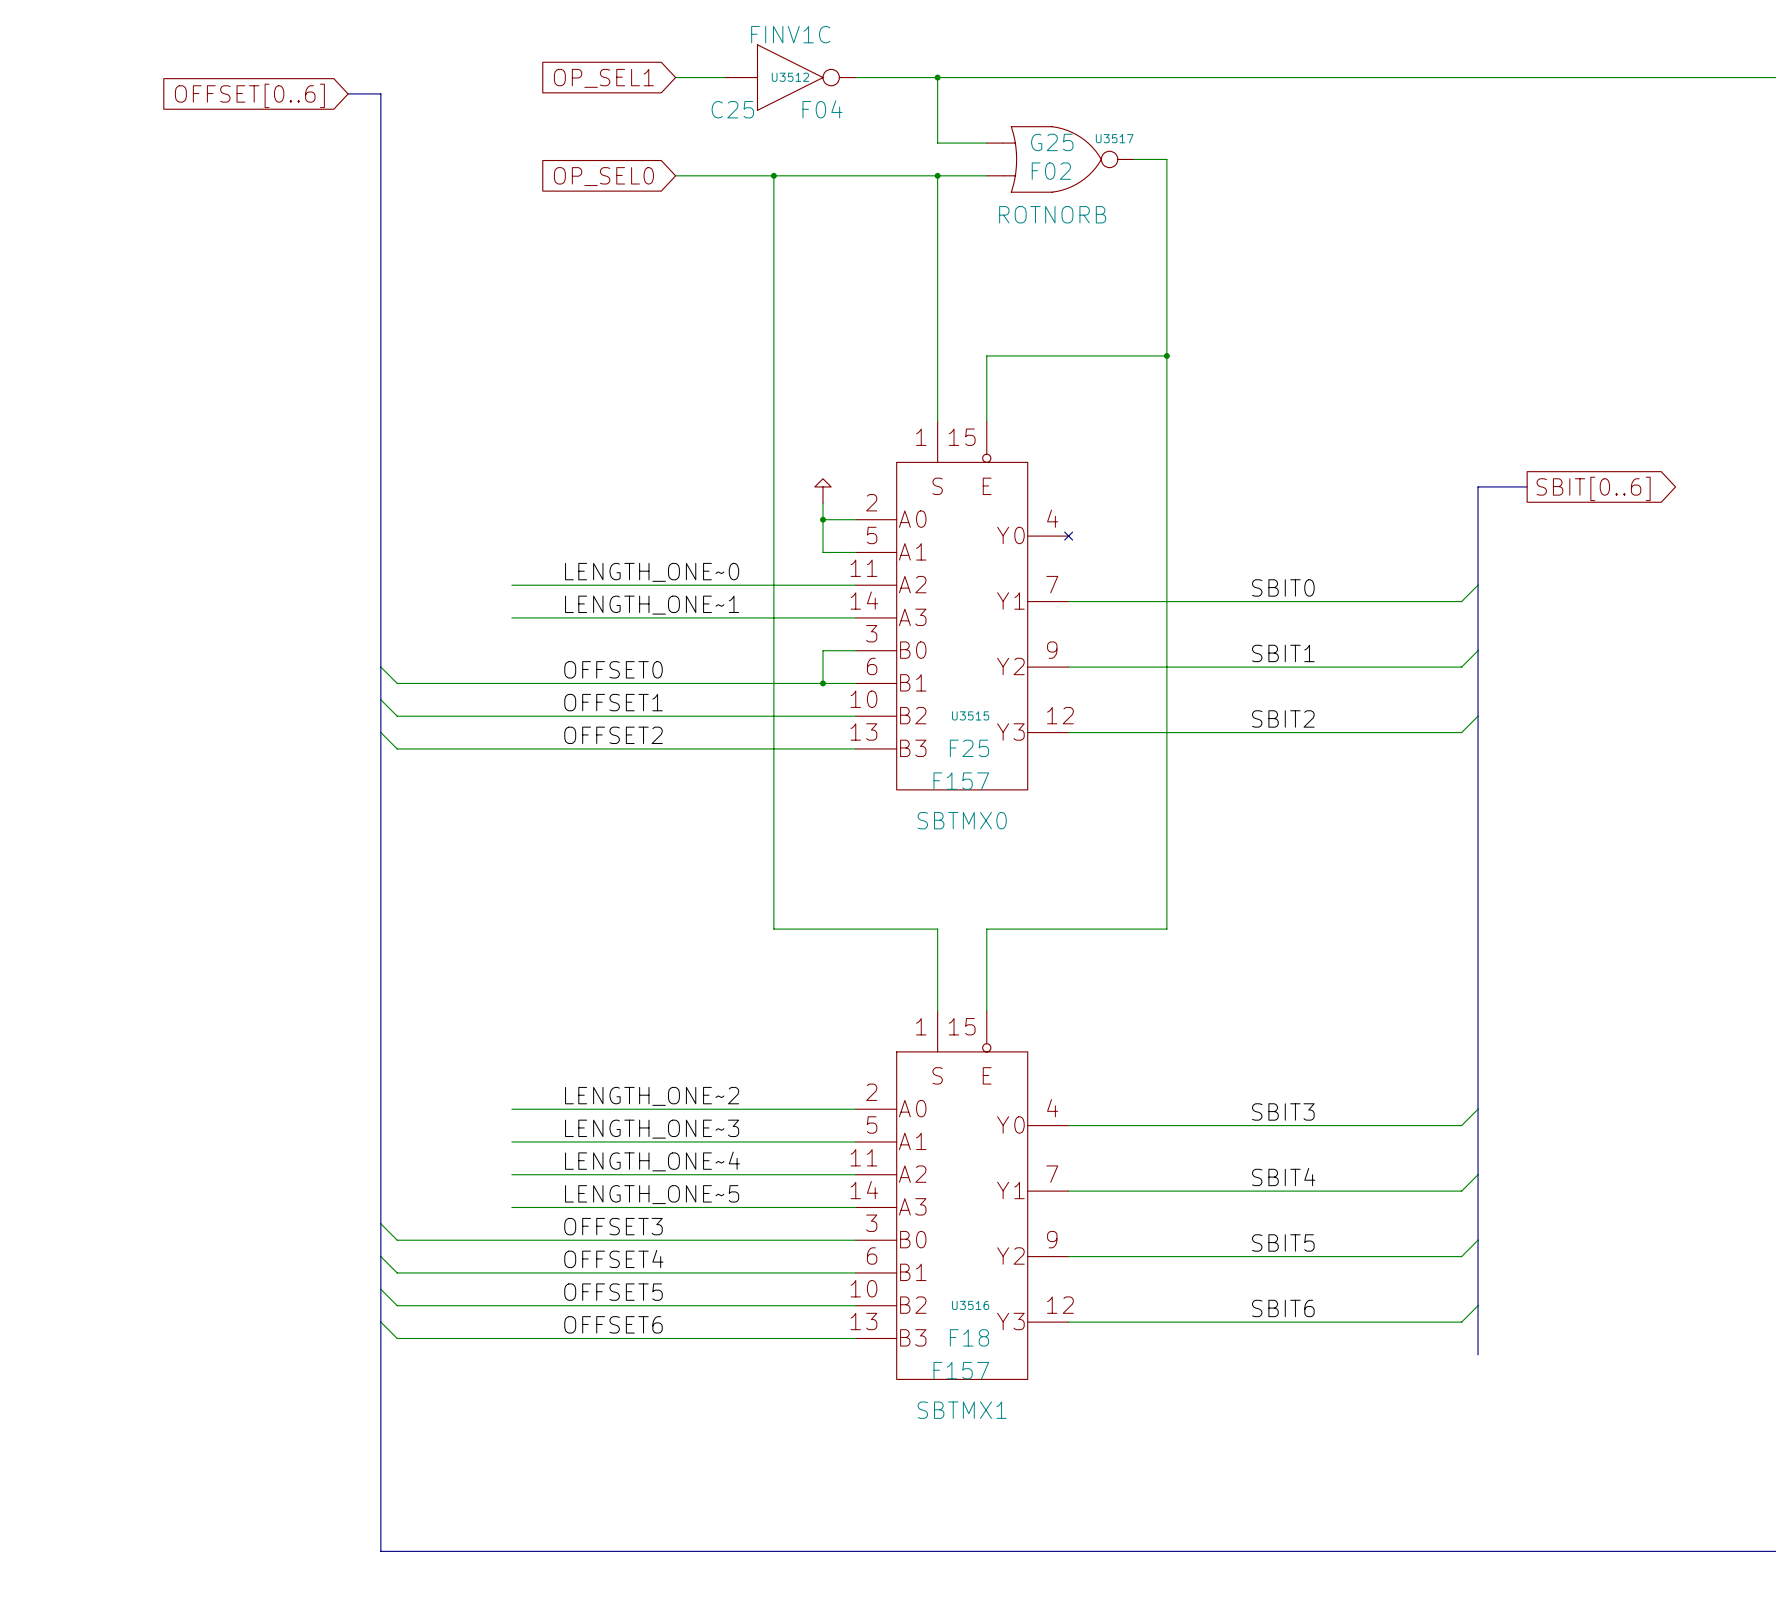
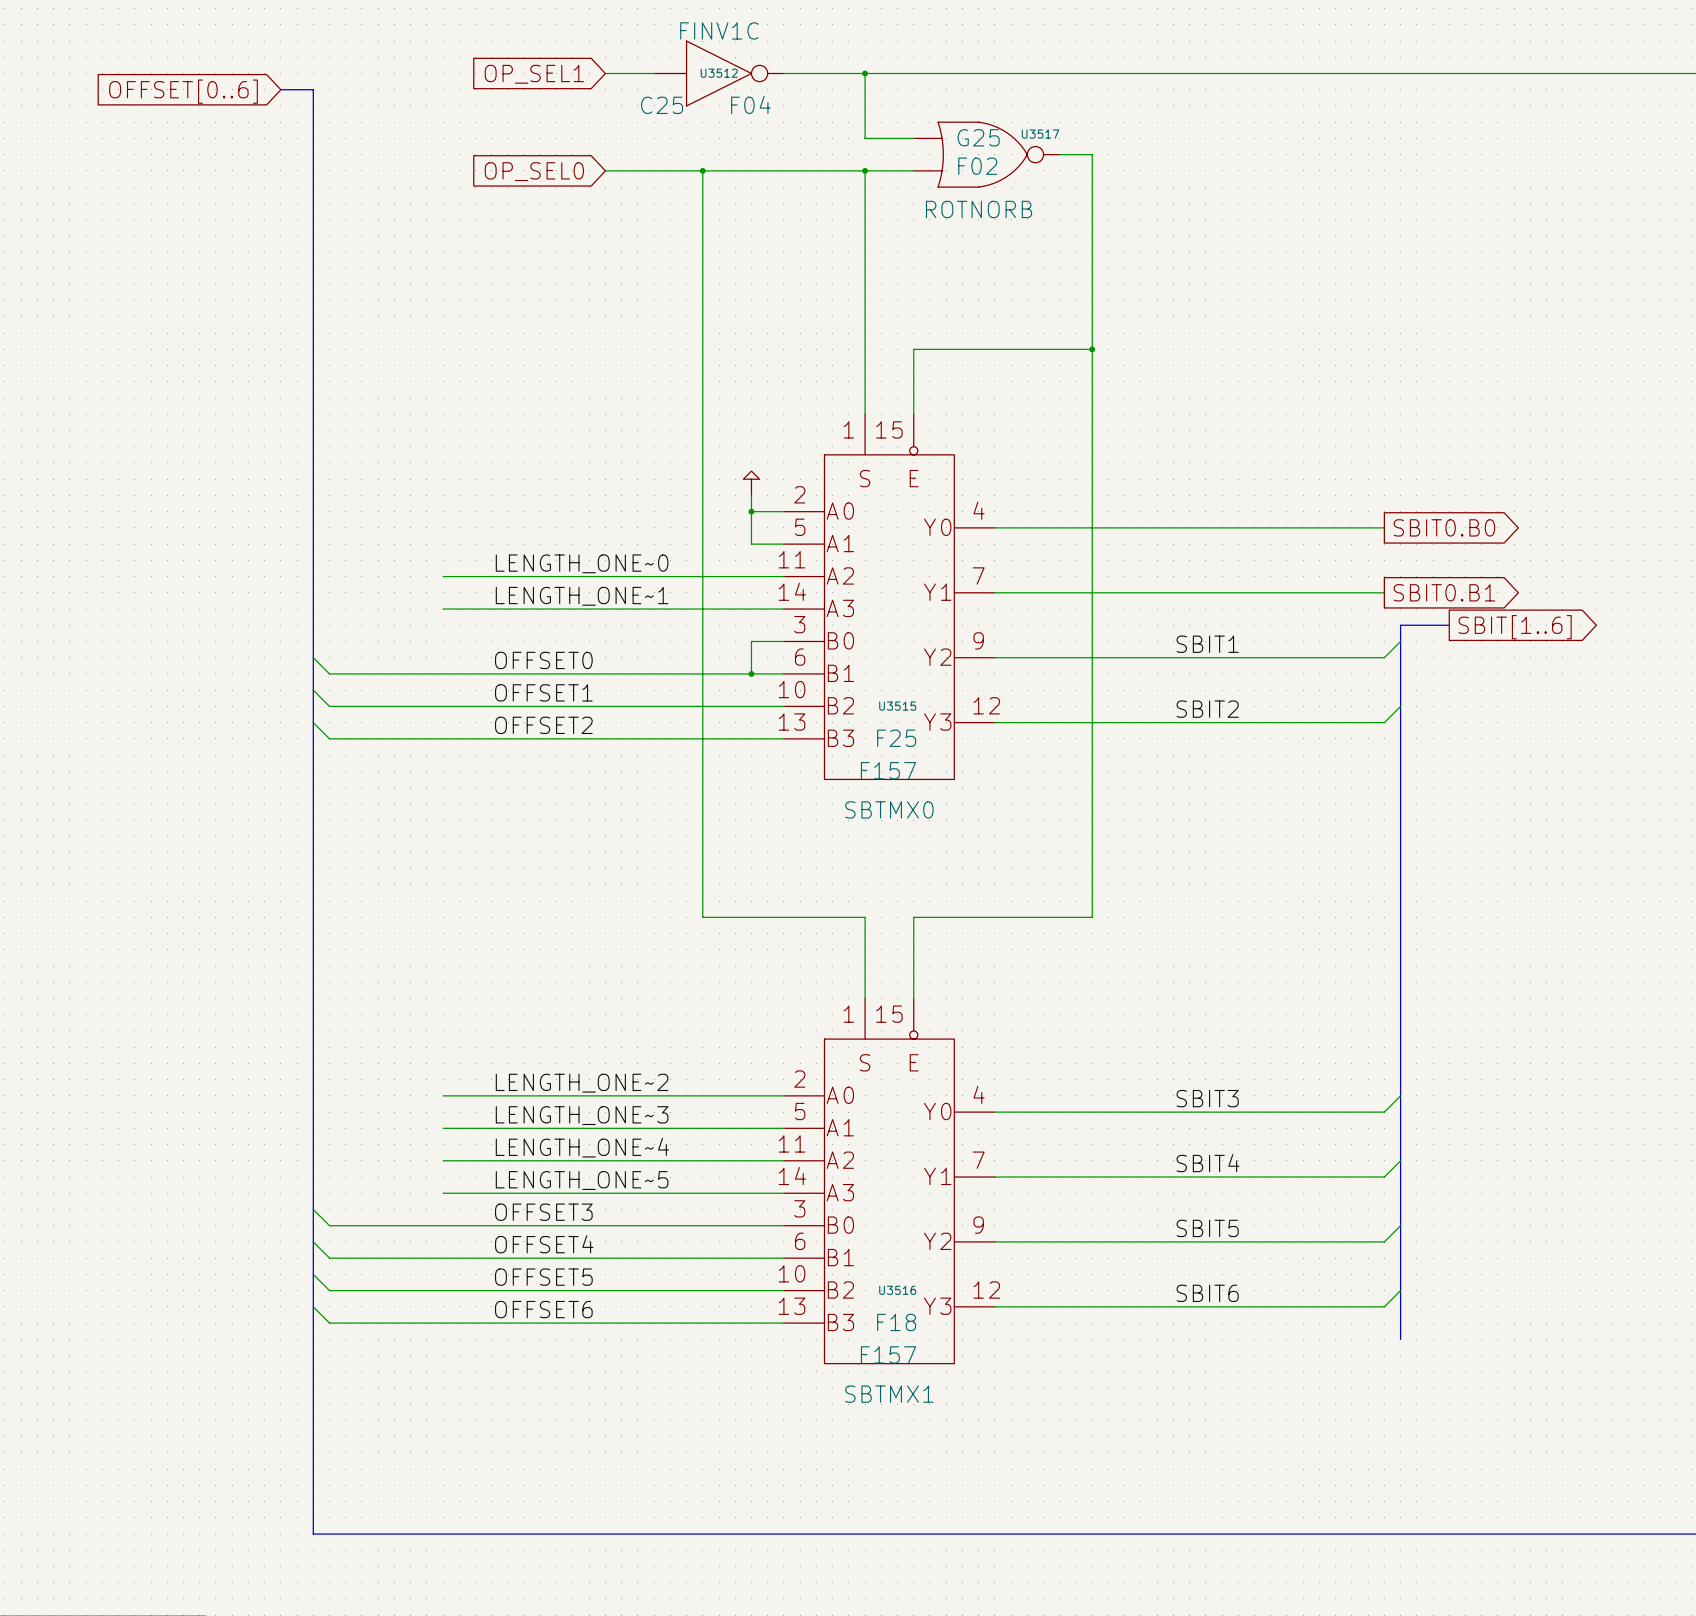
bus: (1527, 486) (1478, 486) (1478, 634) -> (1449, 625) (1400, 625)
global label: SBIT[0..6] (1593, 488) -> none
wire: none -> (994, 527) (1384, 527)
no-connect mark: (1068, 536) -> none
global label: none -> SBIT0.B0 (1444, 527)
wire: (1478, 585) (1461, 601) -> none
label: SBIT0 (1283, 587) -> none
global label: none -> SBIT0.B1 (1444, 592)
global label: none -> SBIT[1..6] (1515, 627)

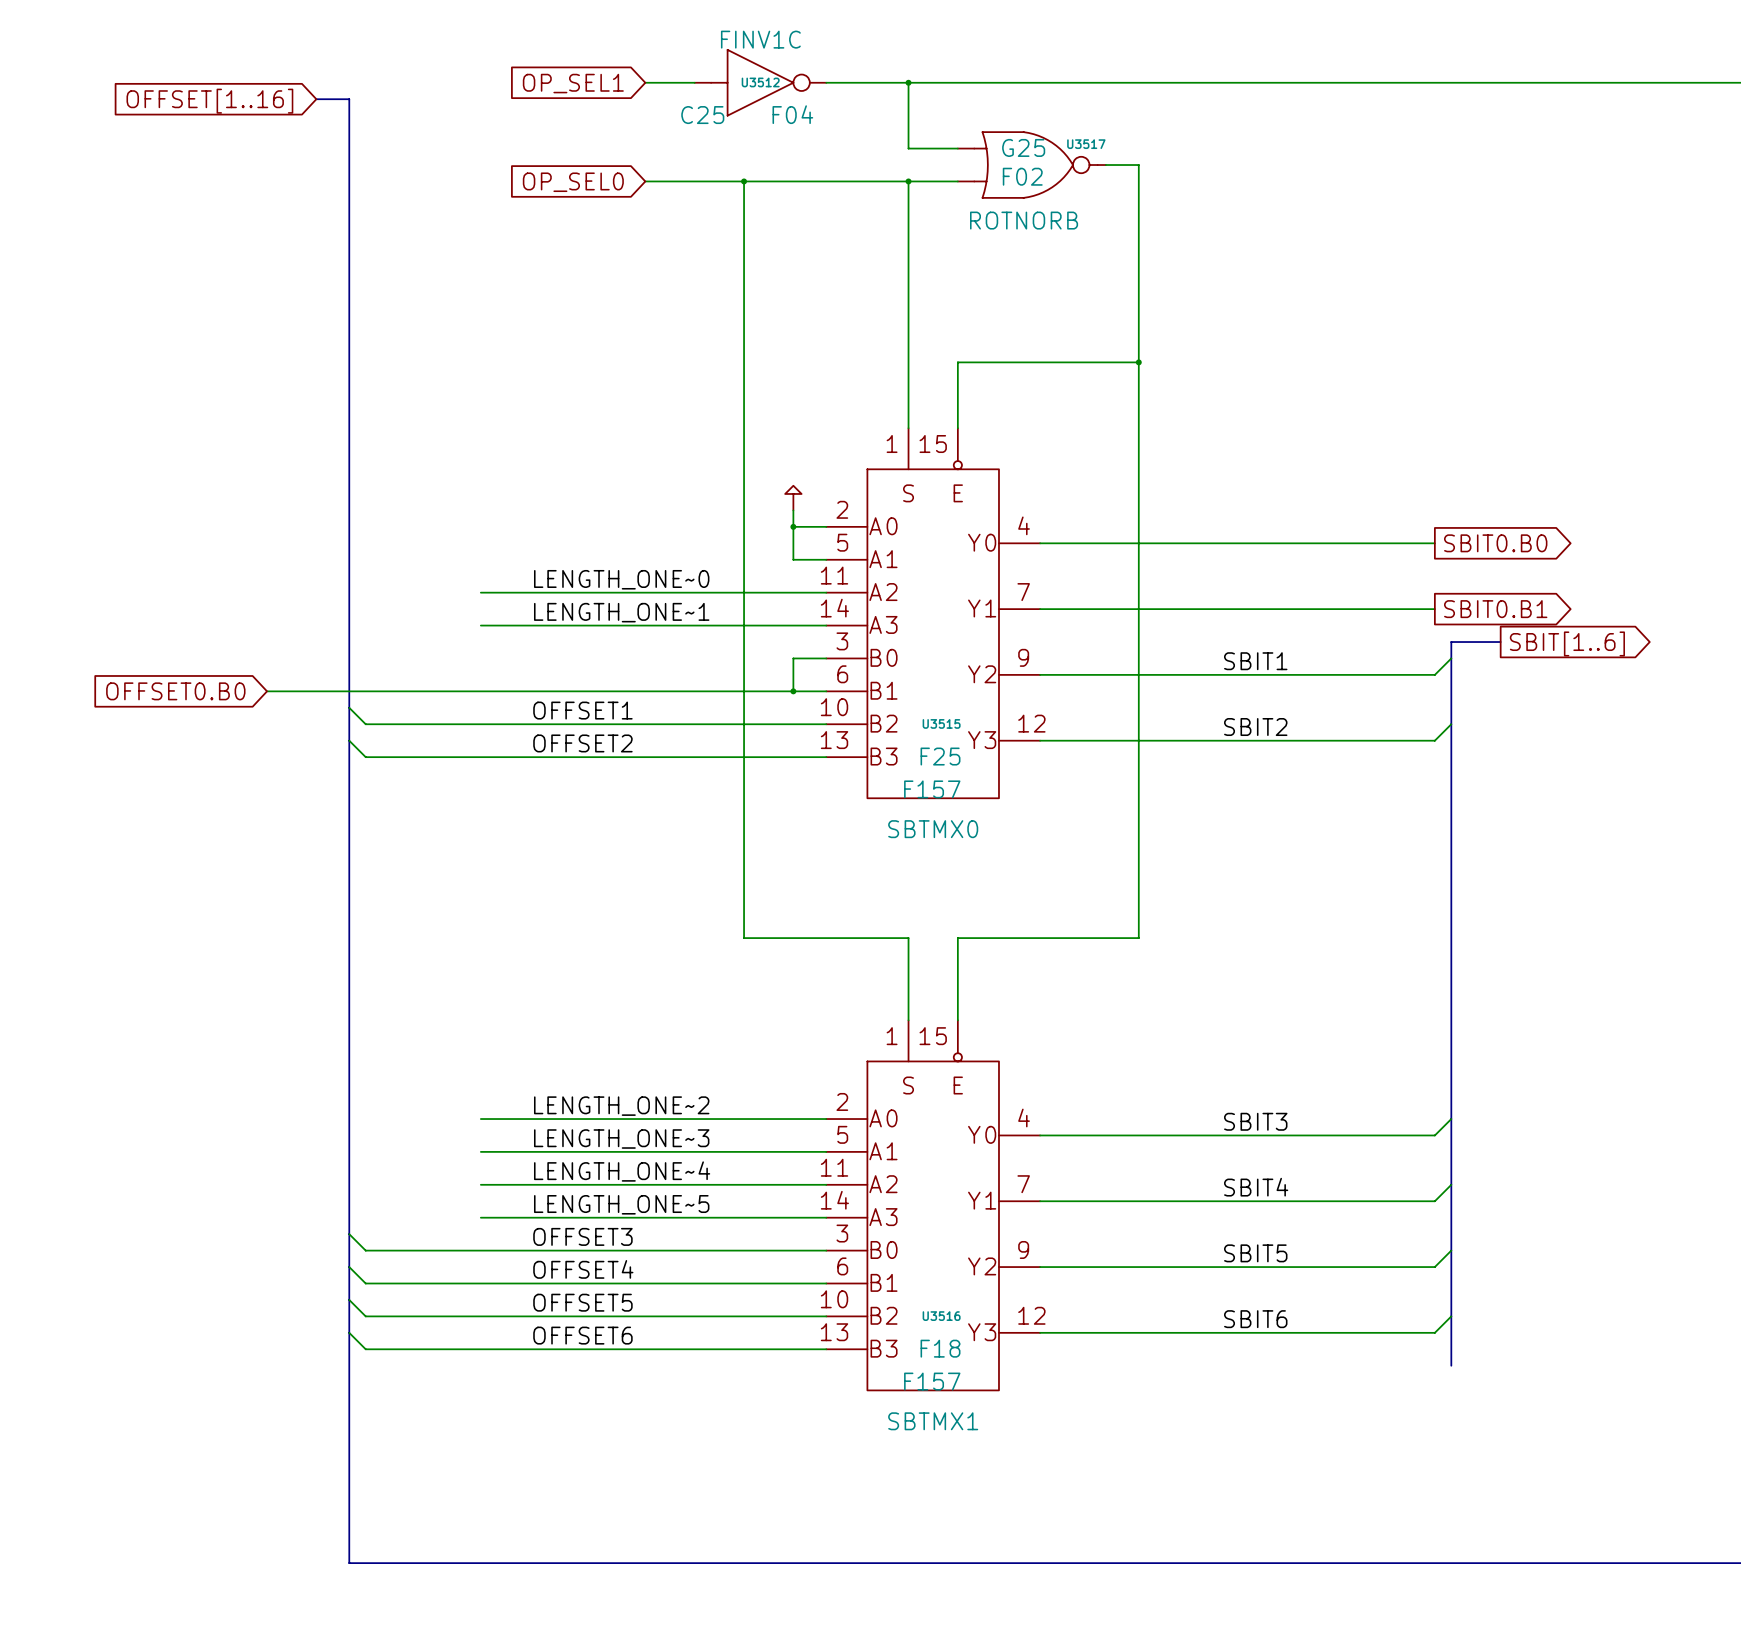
global label: OFFSET[0..6] (183, 91) -> OFFSET[1..16] (209, 101)
wire: (313, 657) (329, 673) -> (267, 691) (365, 691)
label: OFFSET0 (543, 660) -> none
global label: none -> OFFSET0.B0 (175, 691)

